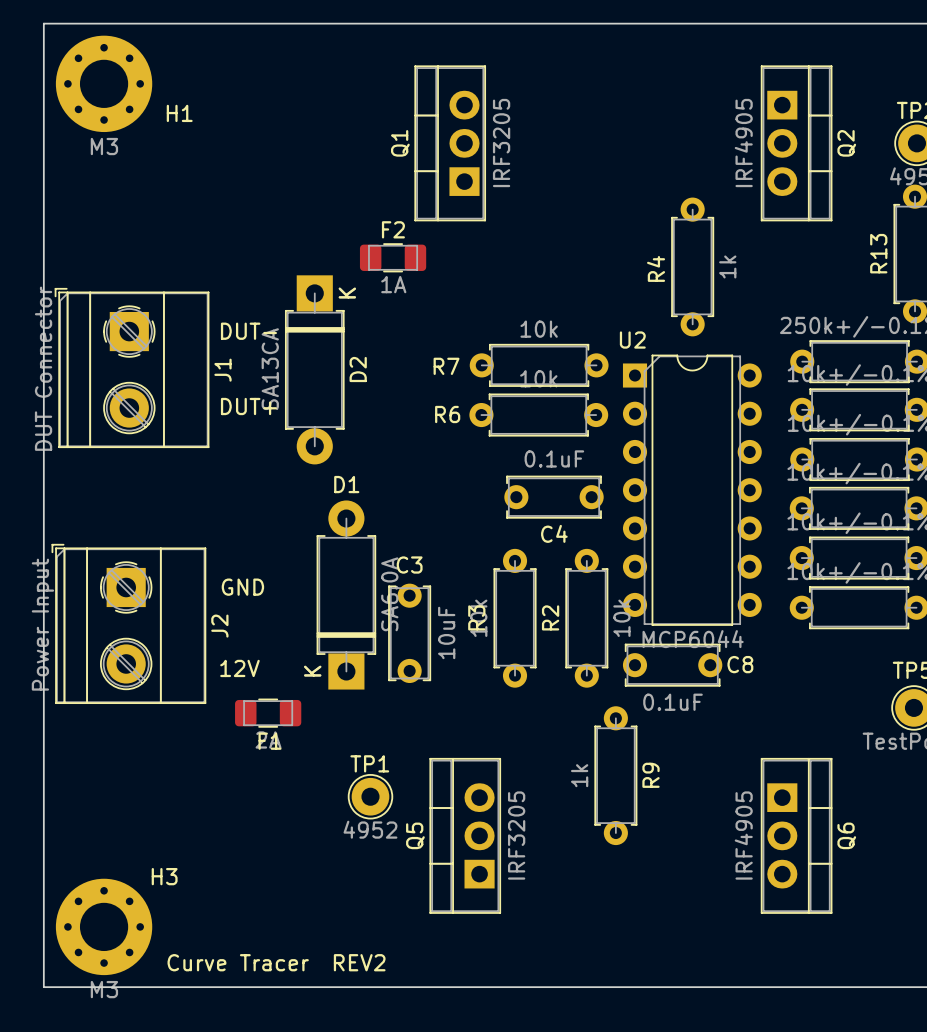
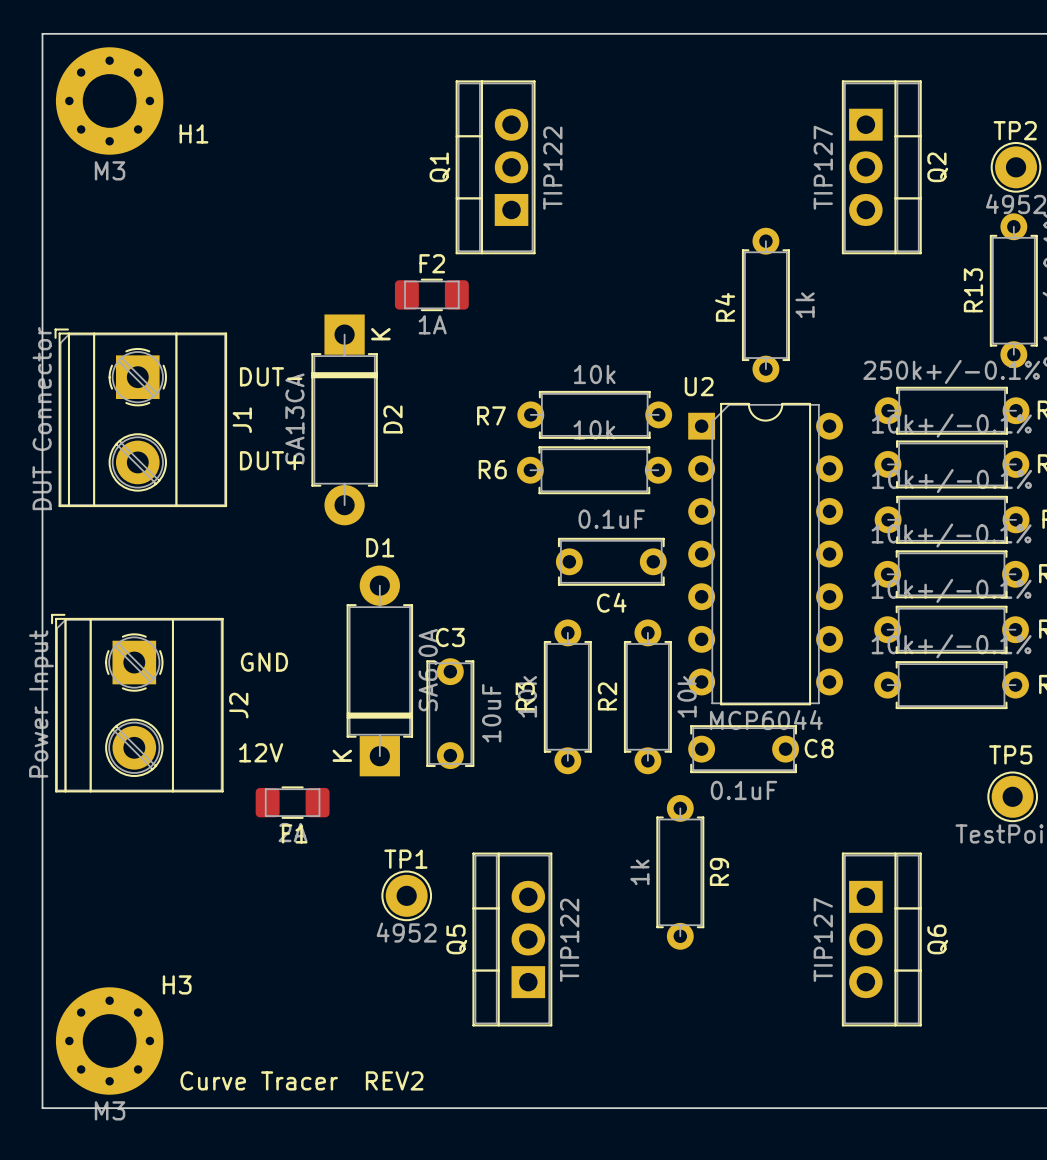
Q1 value: IRF3205 (501, 143) -> TIP122 (552, 168)
Q2 value: IRF4905 (743, 143) -> TIP127 (823, 167)
Q5 value: IRF3205 (516, 835) -> TIP122 (569, 940)
Q6 value: IRF4905 (743, 835) -> TIP127 (823, 939)

